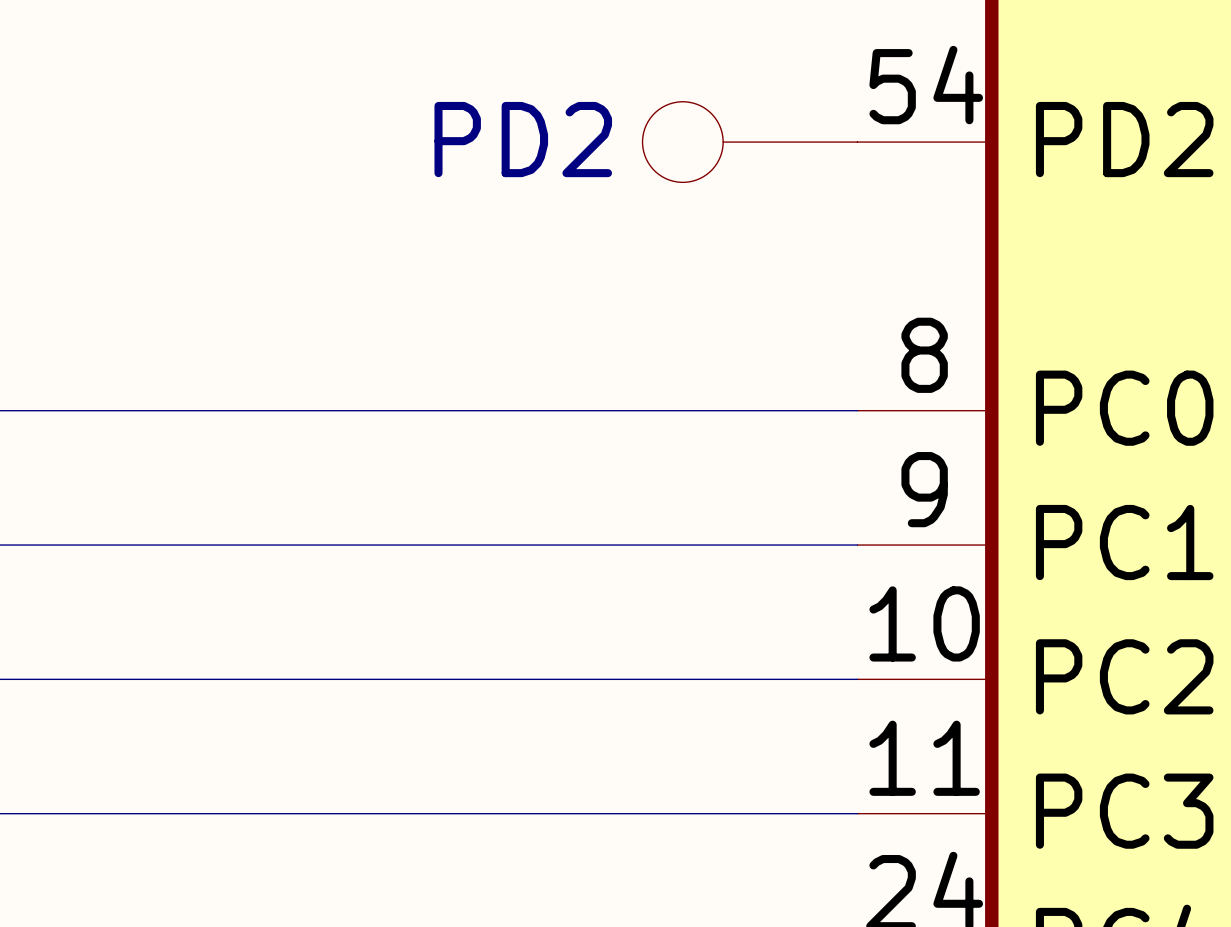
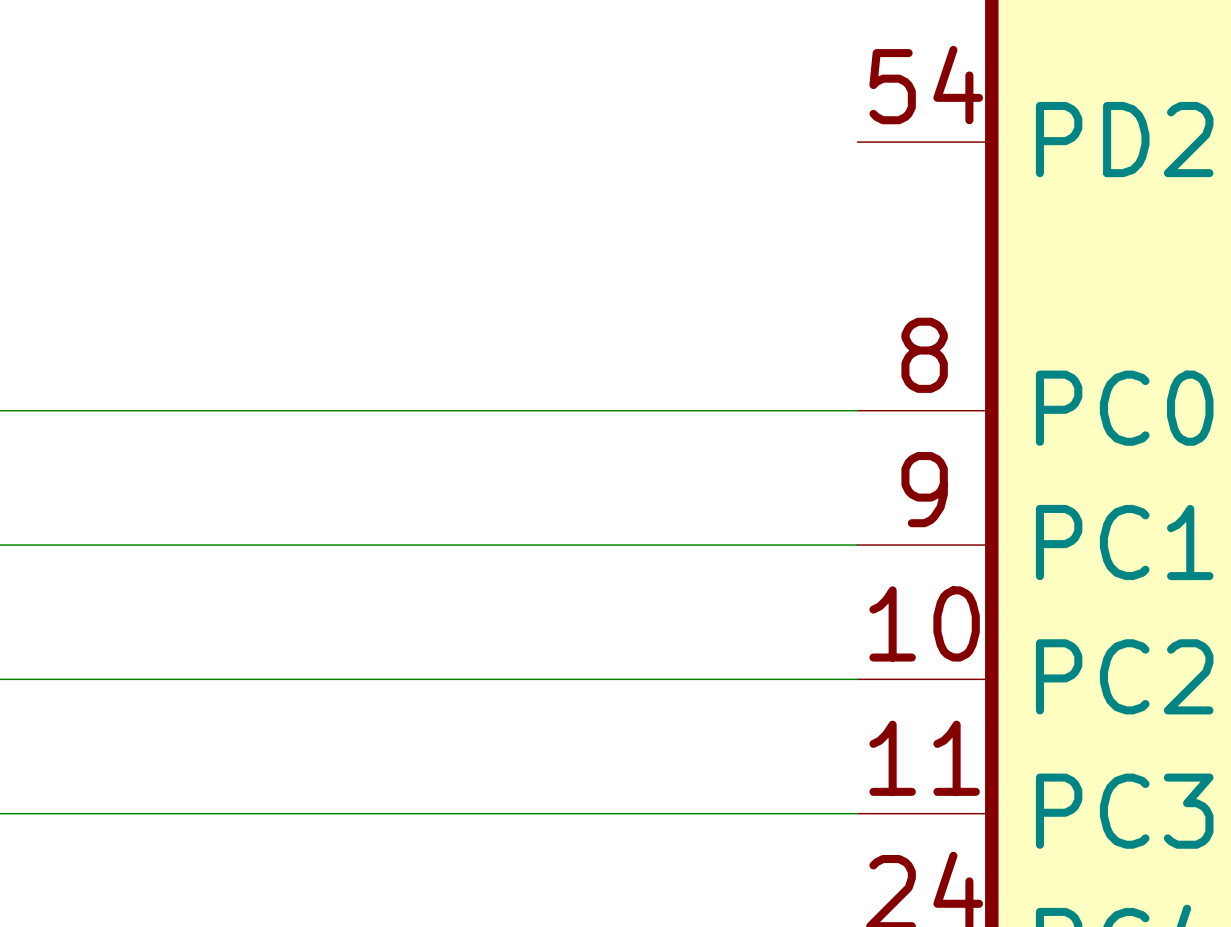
part: PD2 (750, 142) -> none

